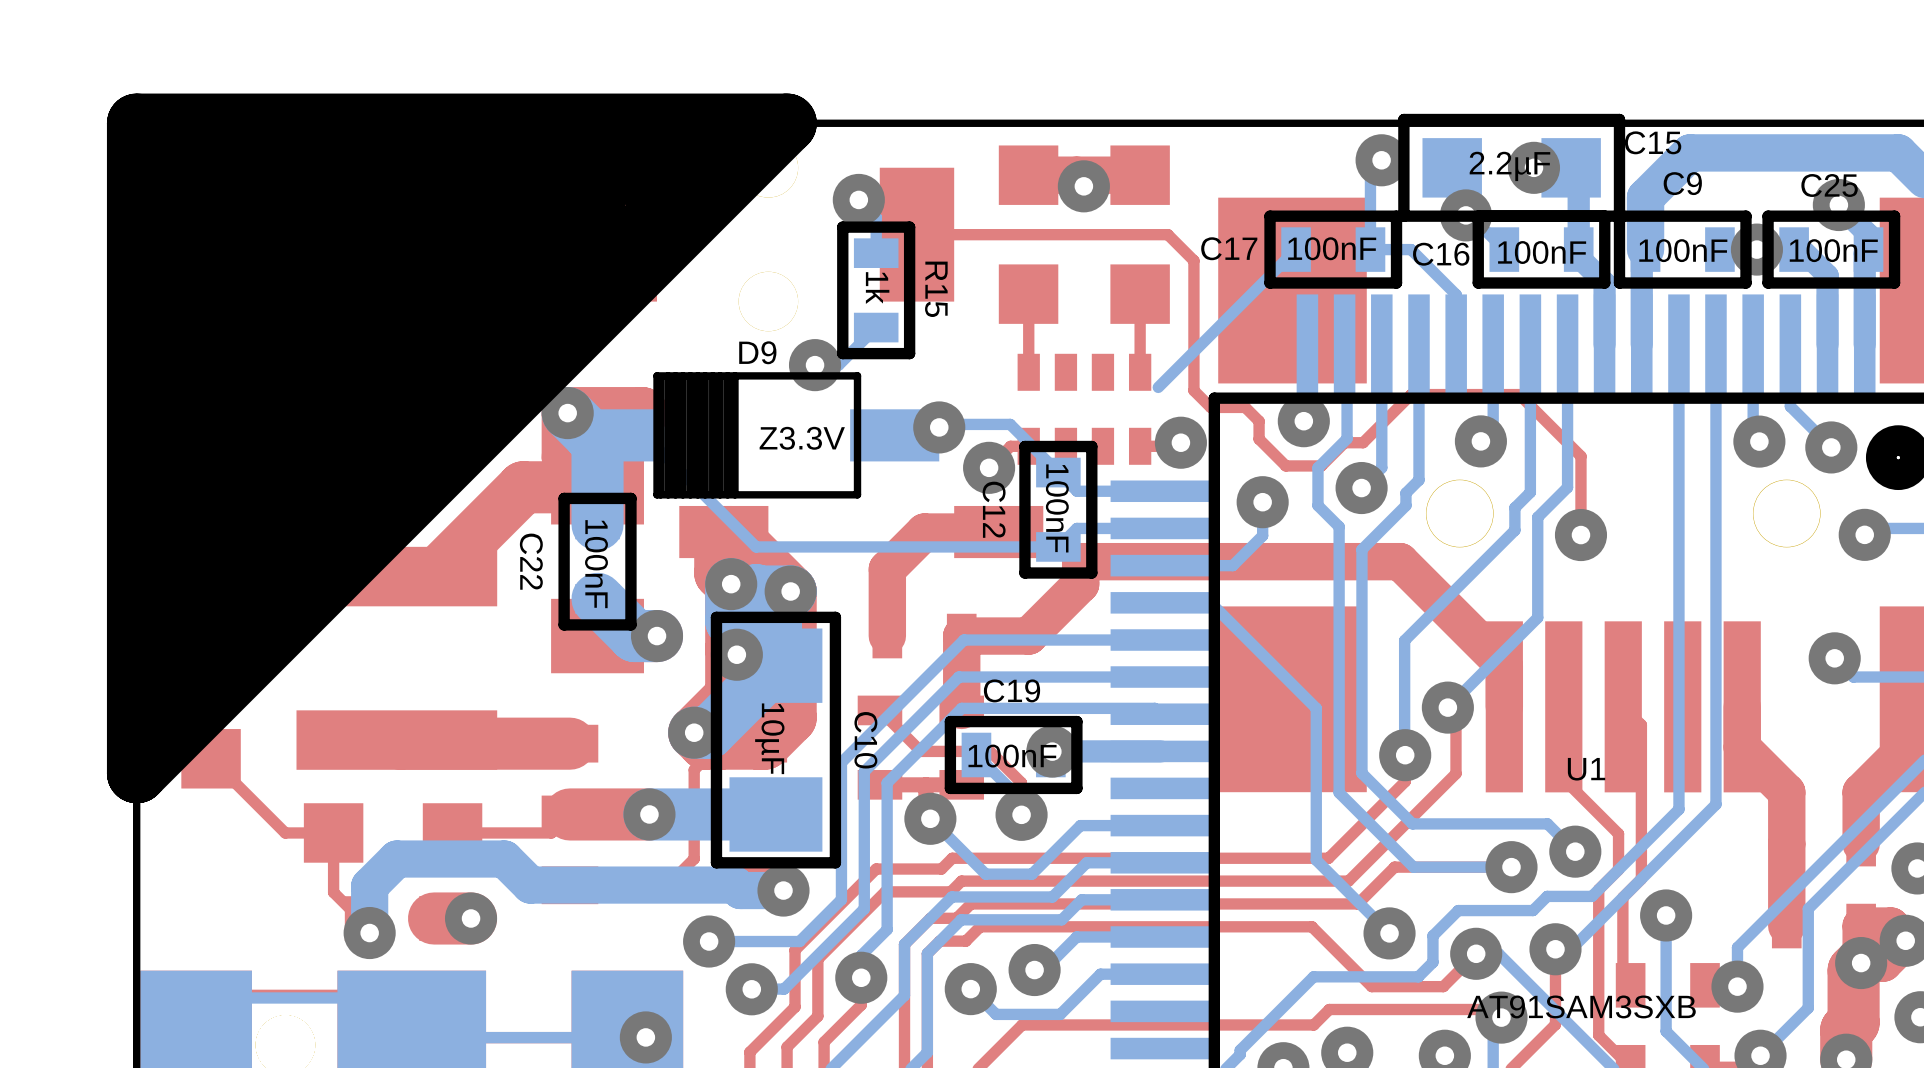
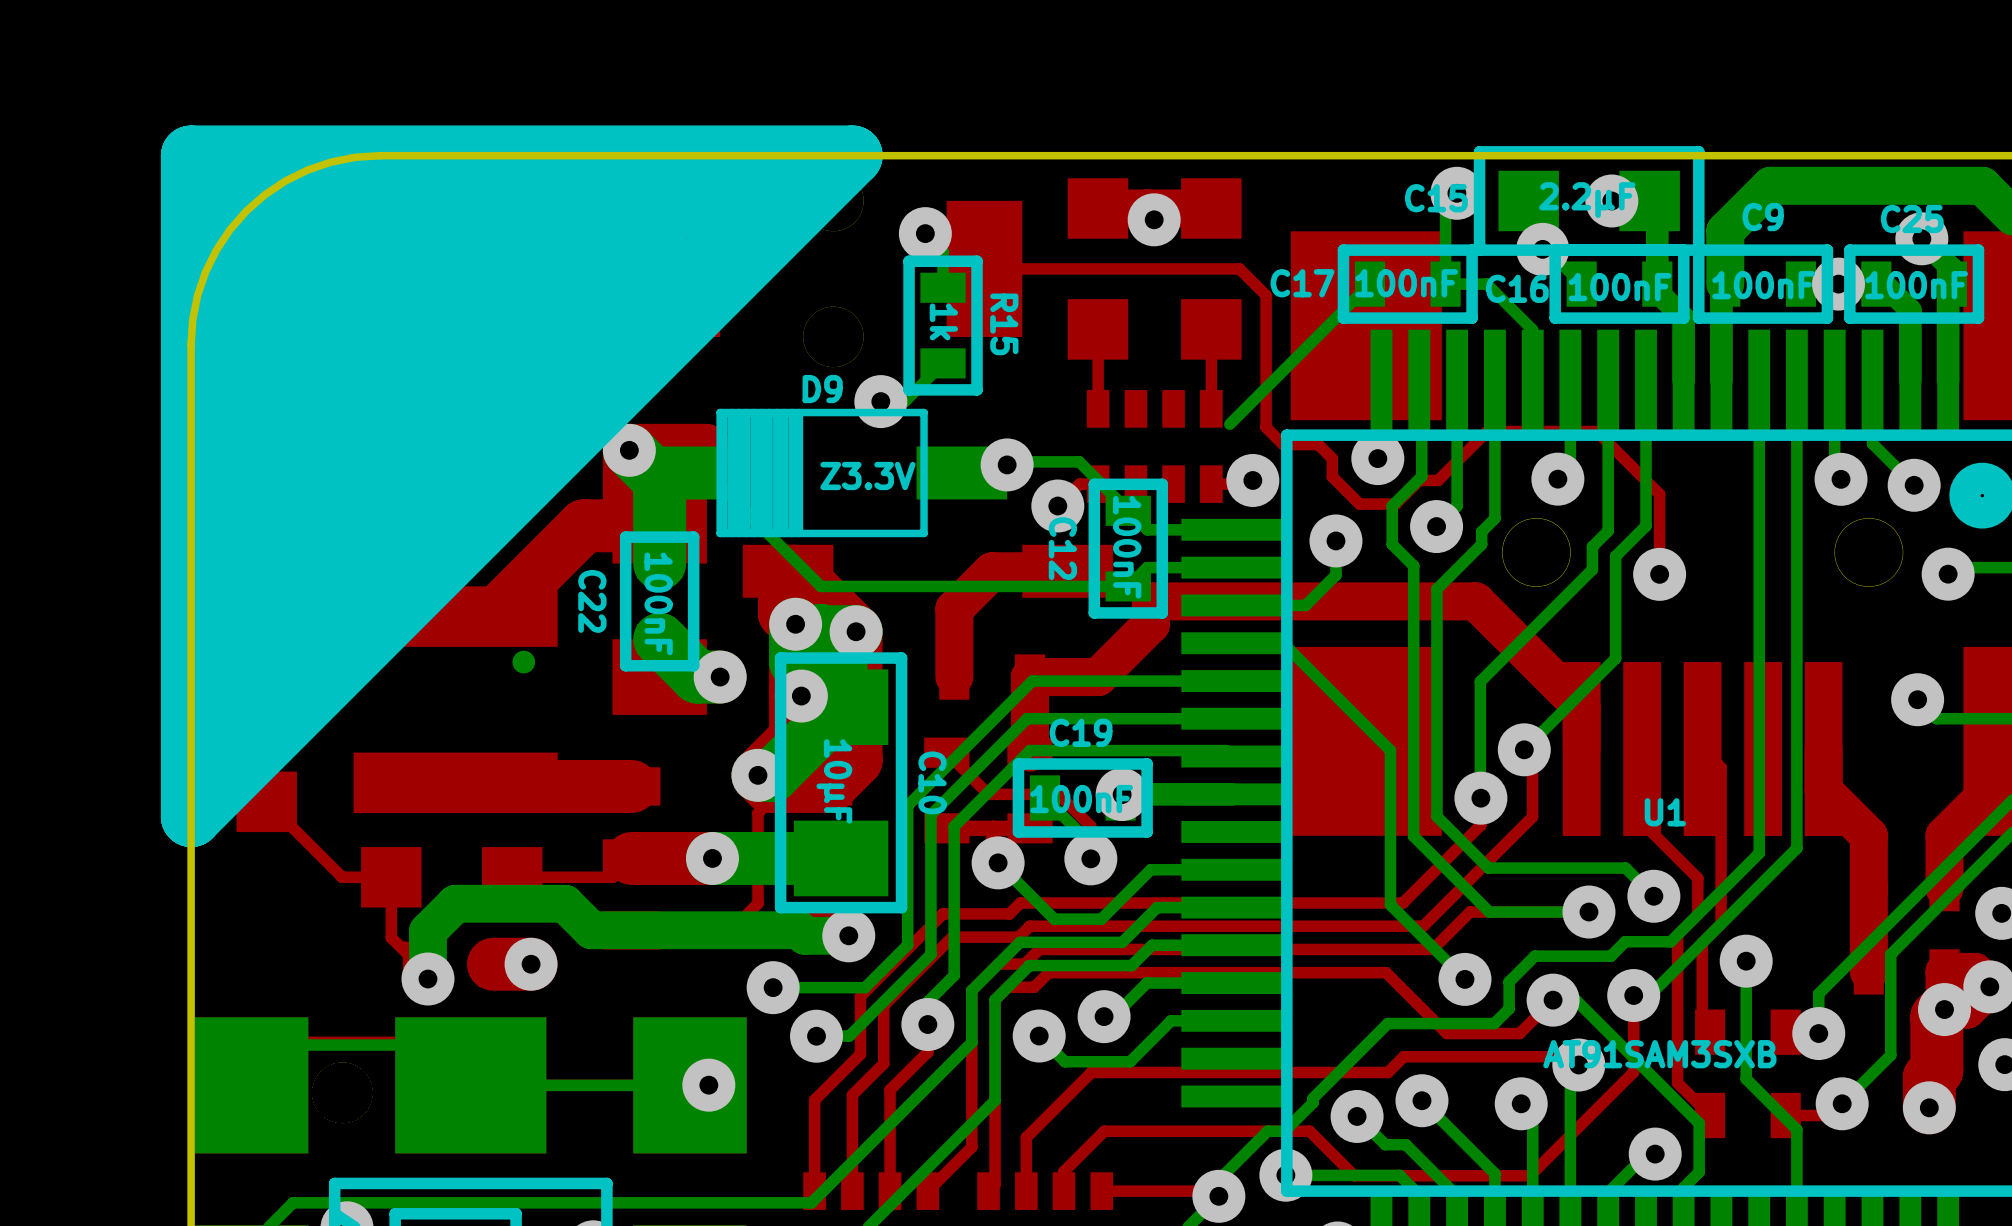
C15 name position: C15 (1653, 142) -> C15 (1436, 198)
part: none -> (523, 662)

